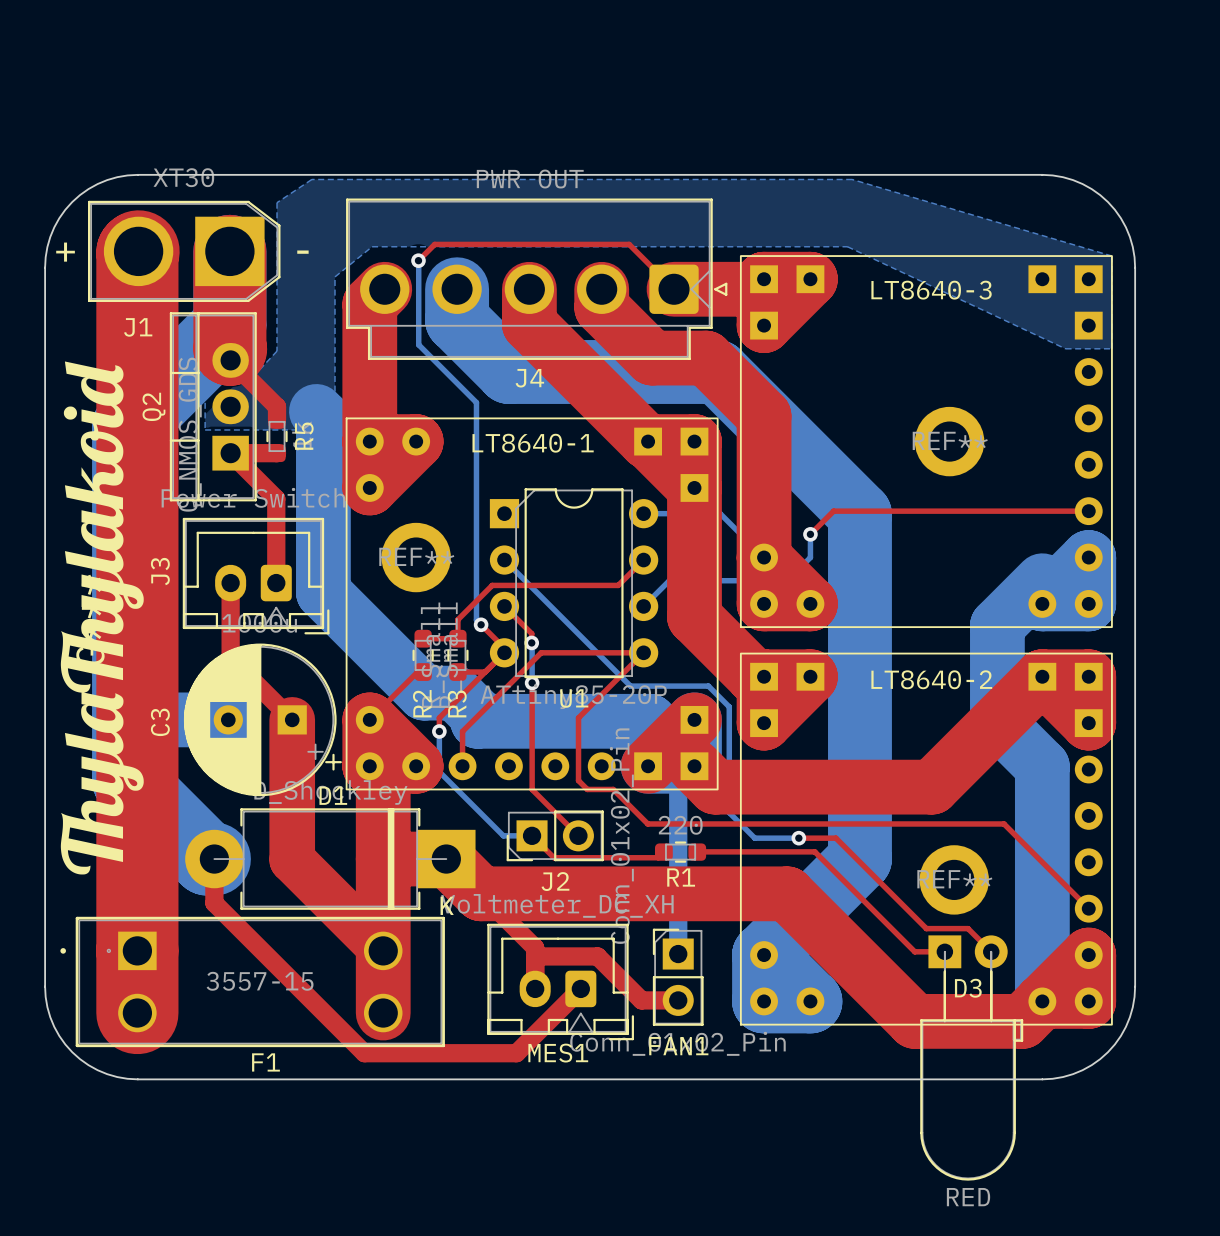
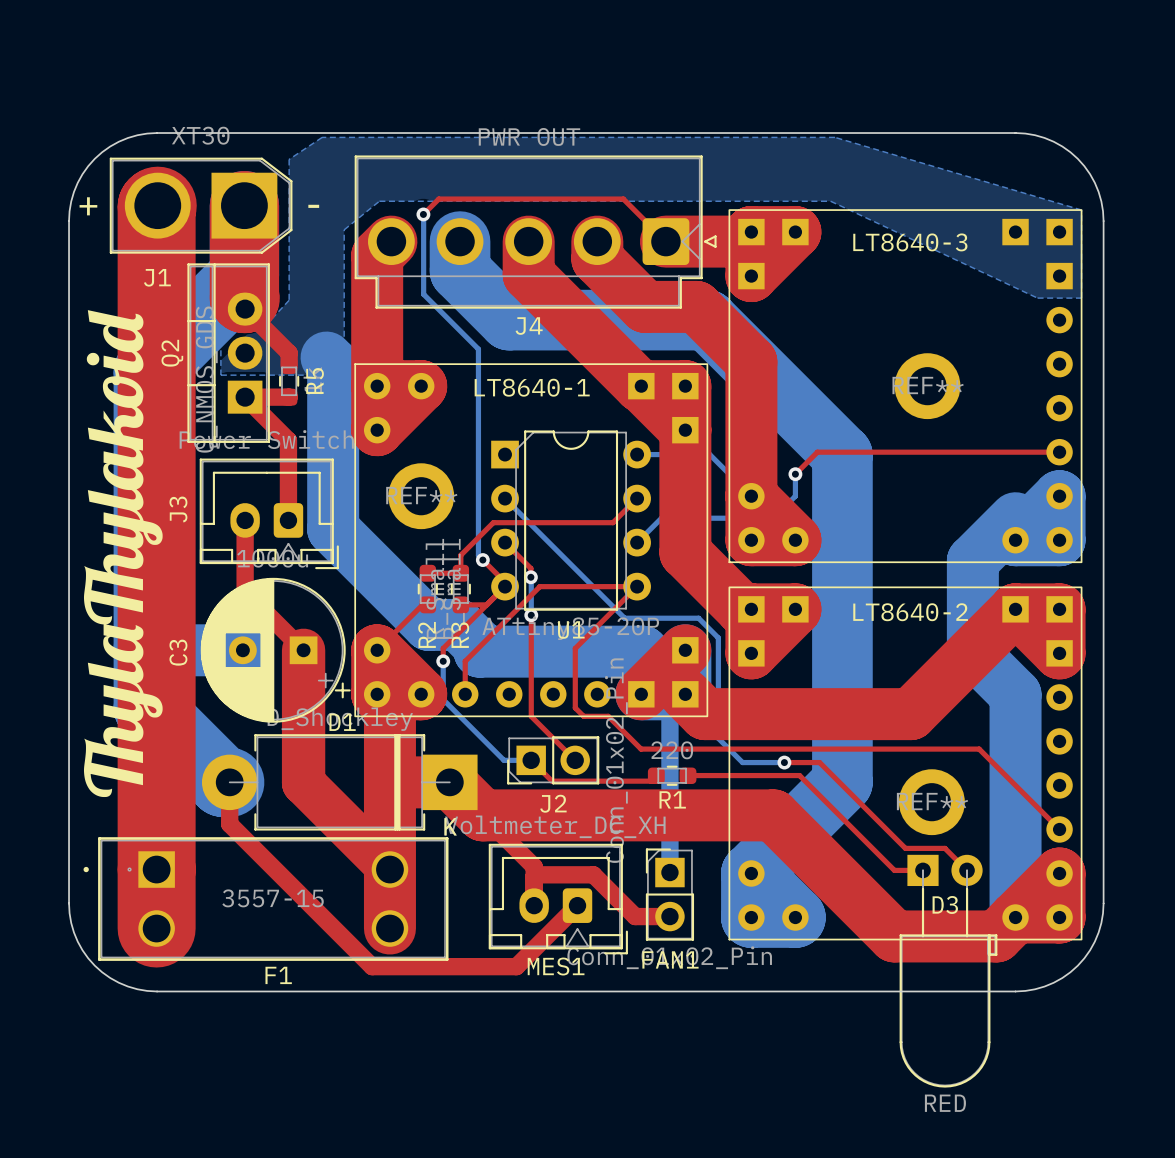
drawing: none -> [83, 310, 163, 798]
part: (102, 617) -> none

